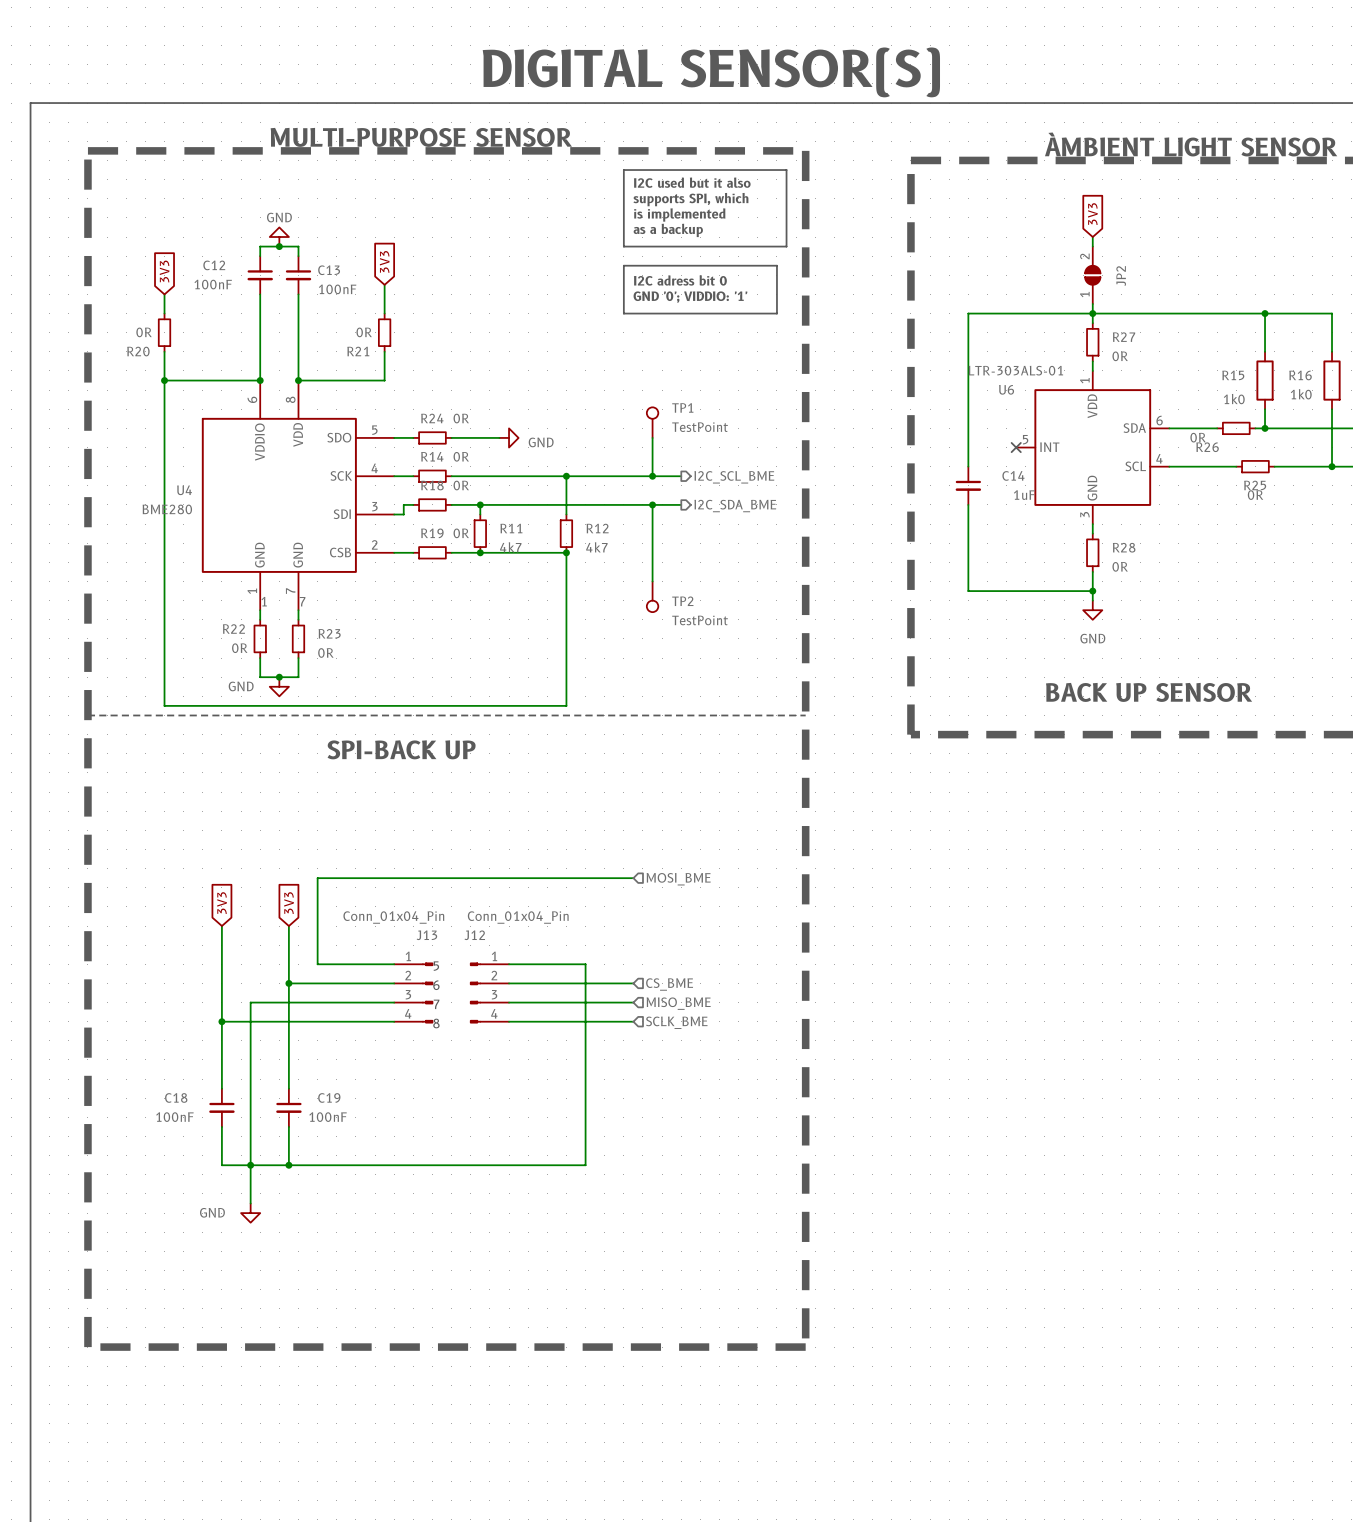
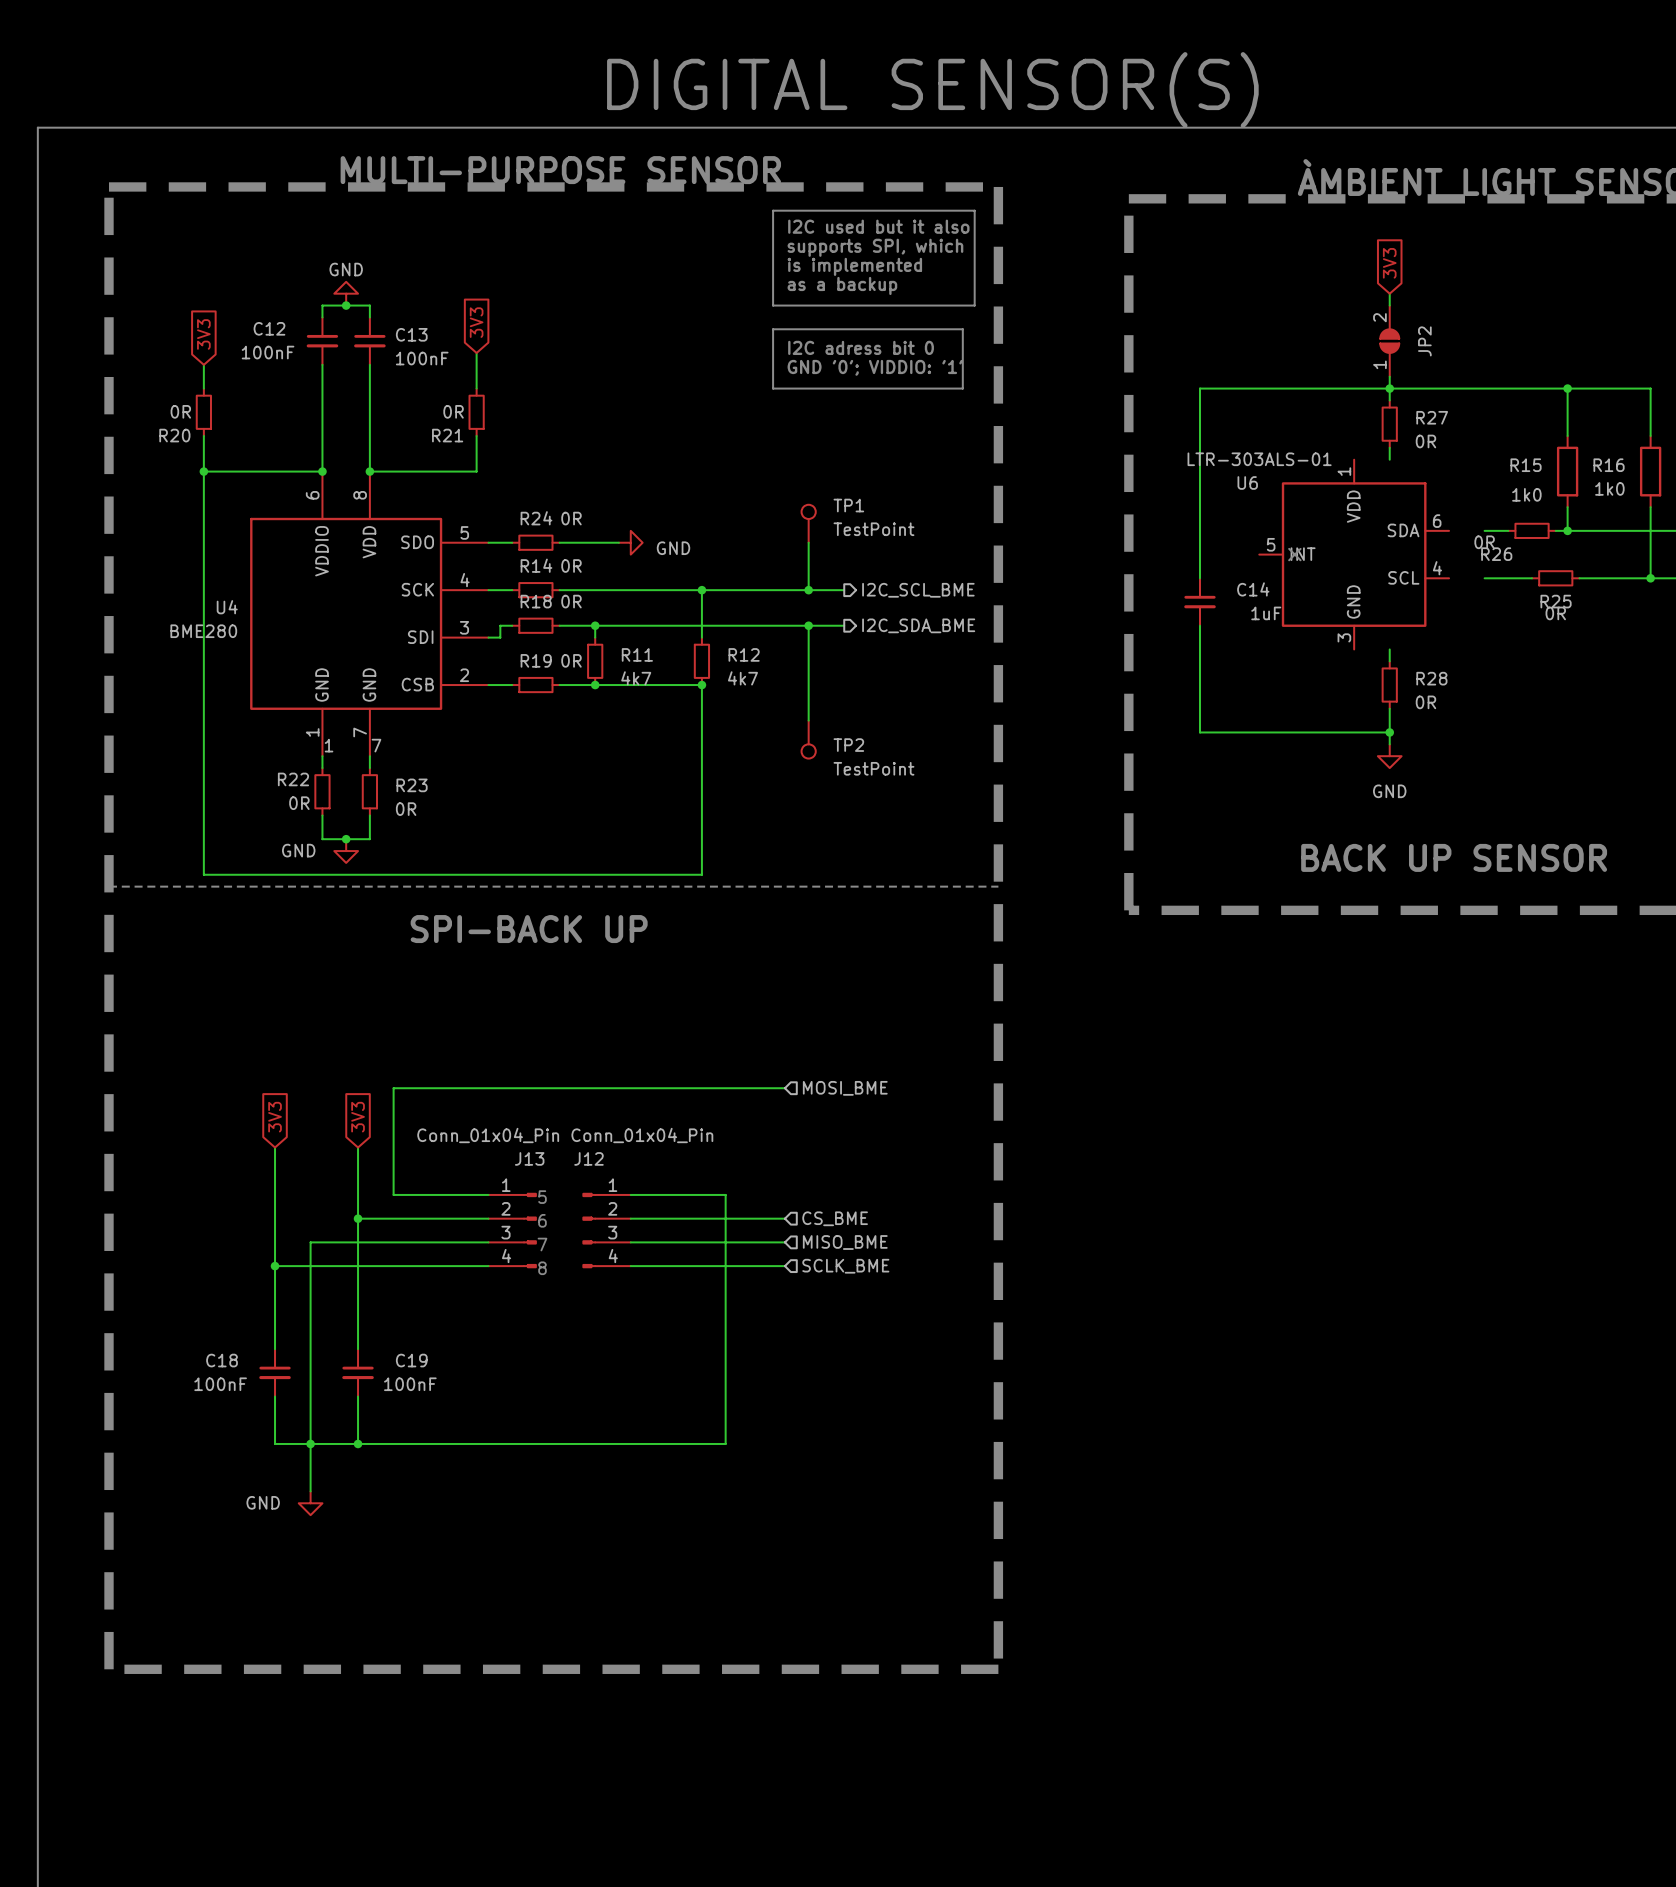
global label position: 3V3 (1092, 214) -> 3V3 (1389, 263)
wire: (1092, 237) (1092, 246) -> (1389, 293) (1389, 305)
JP2 position: (1092, 275) -> (1389, 341)
wire: (1092, 303) (1092, 323) -> (1389, 376) (1389, 400)
junction position: (1092, 313) -> (1389, 388)
R27 position: (1092, 342) -> (1389, 424)
wire: (1092, 361) (1092, 370) -> (1389, 447) (1389, 459)
wire: (1169, 428) (1198, 428) -> none
no-connect mark position: (1016, 447) -> (1294, 554)
wire: (1169, 466) (1198, 466) -> (1354, 732) (1389, 732)
wire: (1092, 524) (1092, 533) -> (1389, 649) (1389, 661)
R28 position: (1092, 552) -> (1389, 685)
wire: (1092, 571) (1092, 600) -> (1389, 708) (1389, 744)
junction position: (1092, 591) -> (1389, 732)
power symbol position: GND (1092, 610) -> GND (1389, 756)

